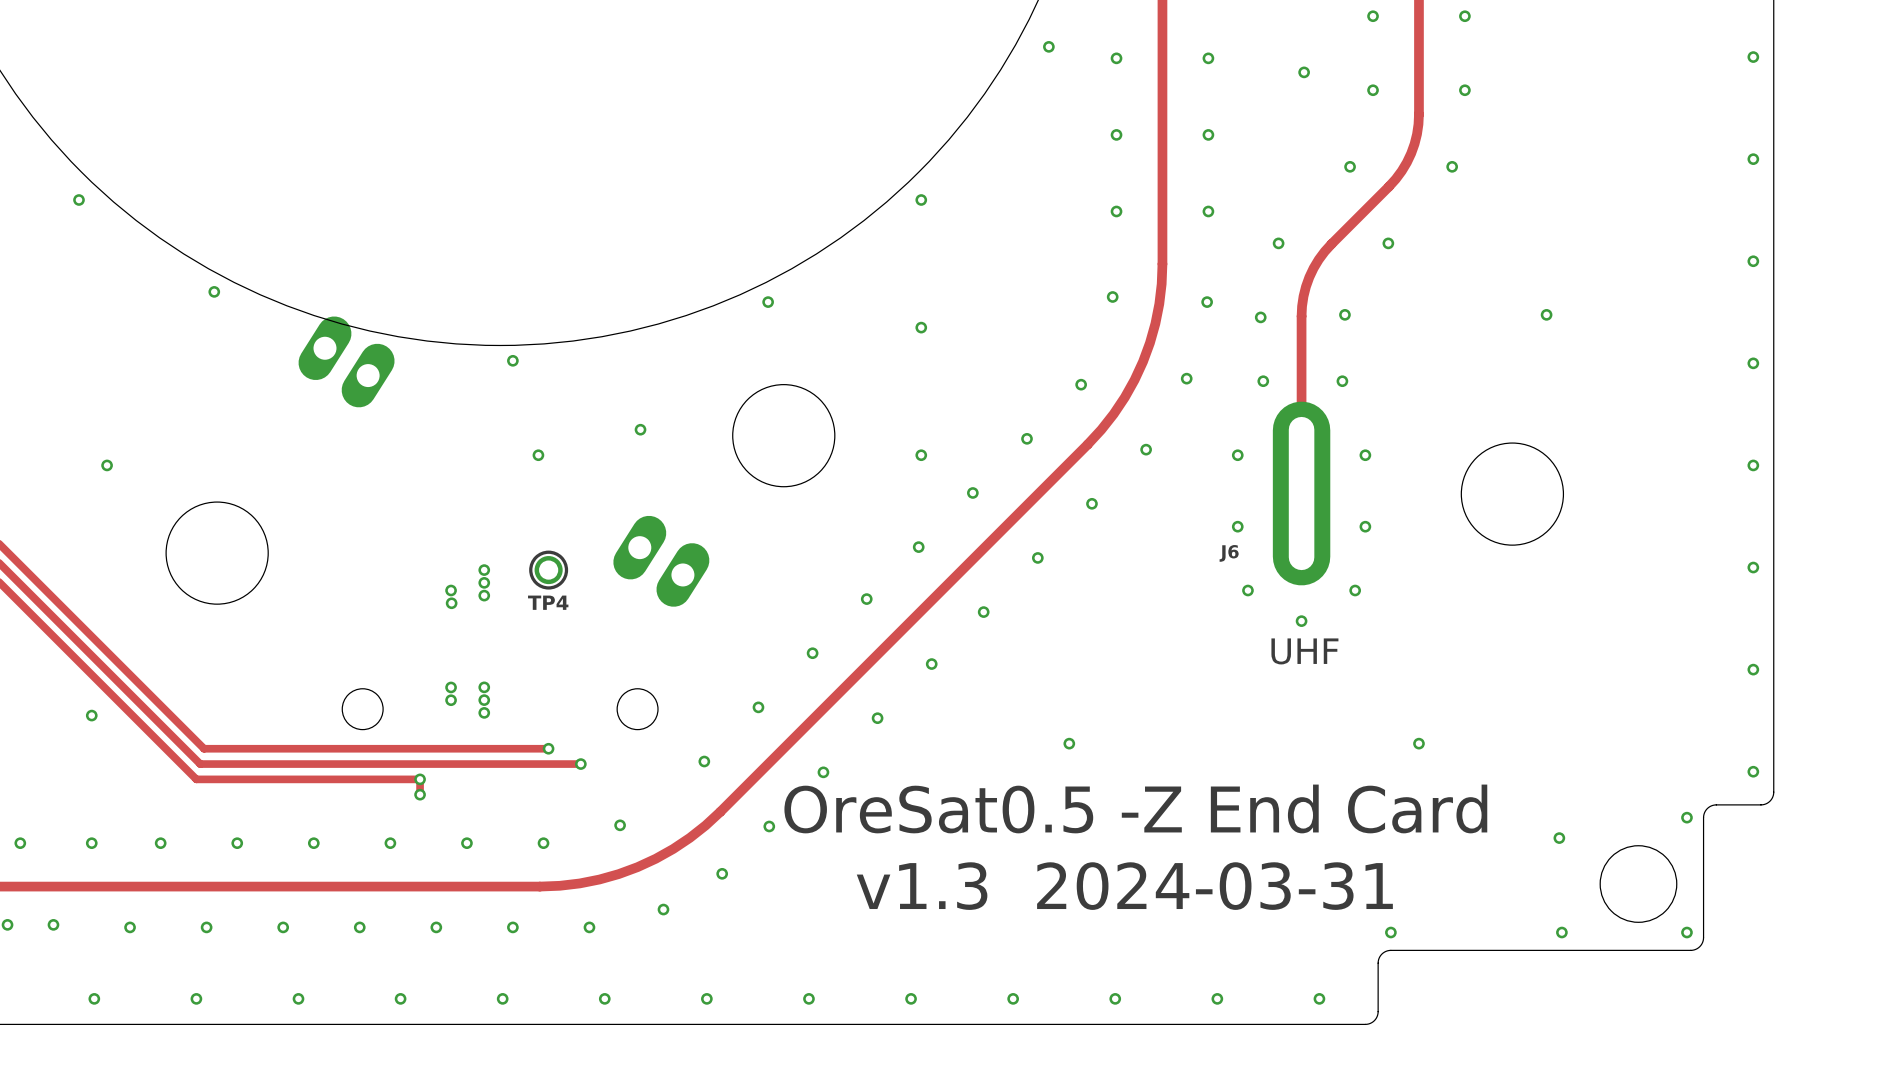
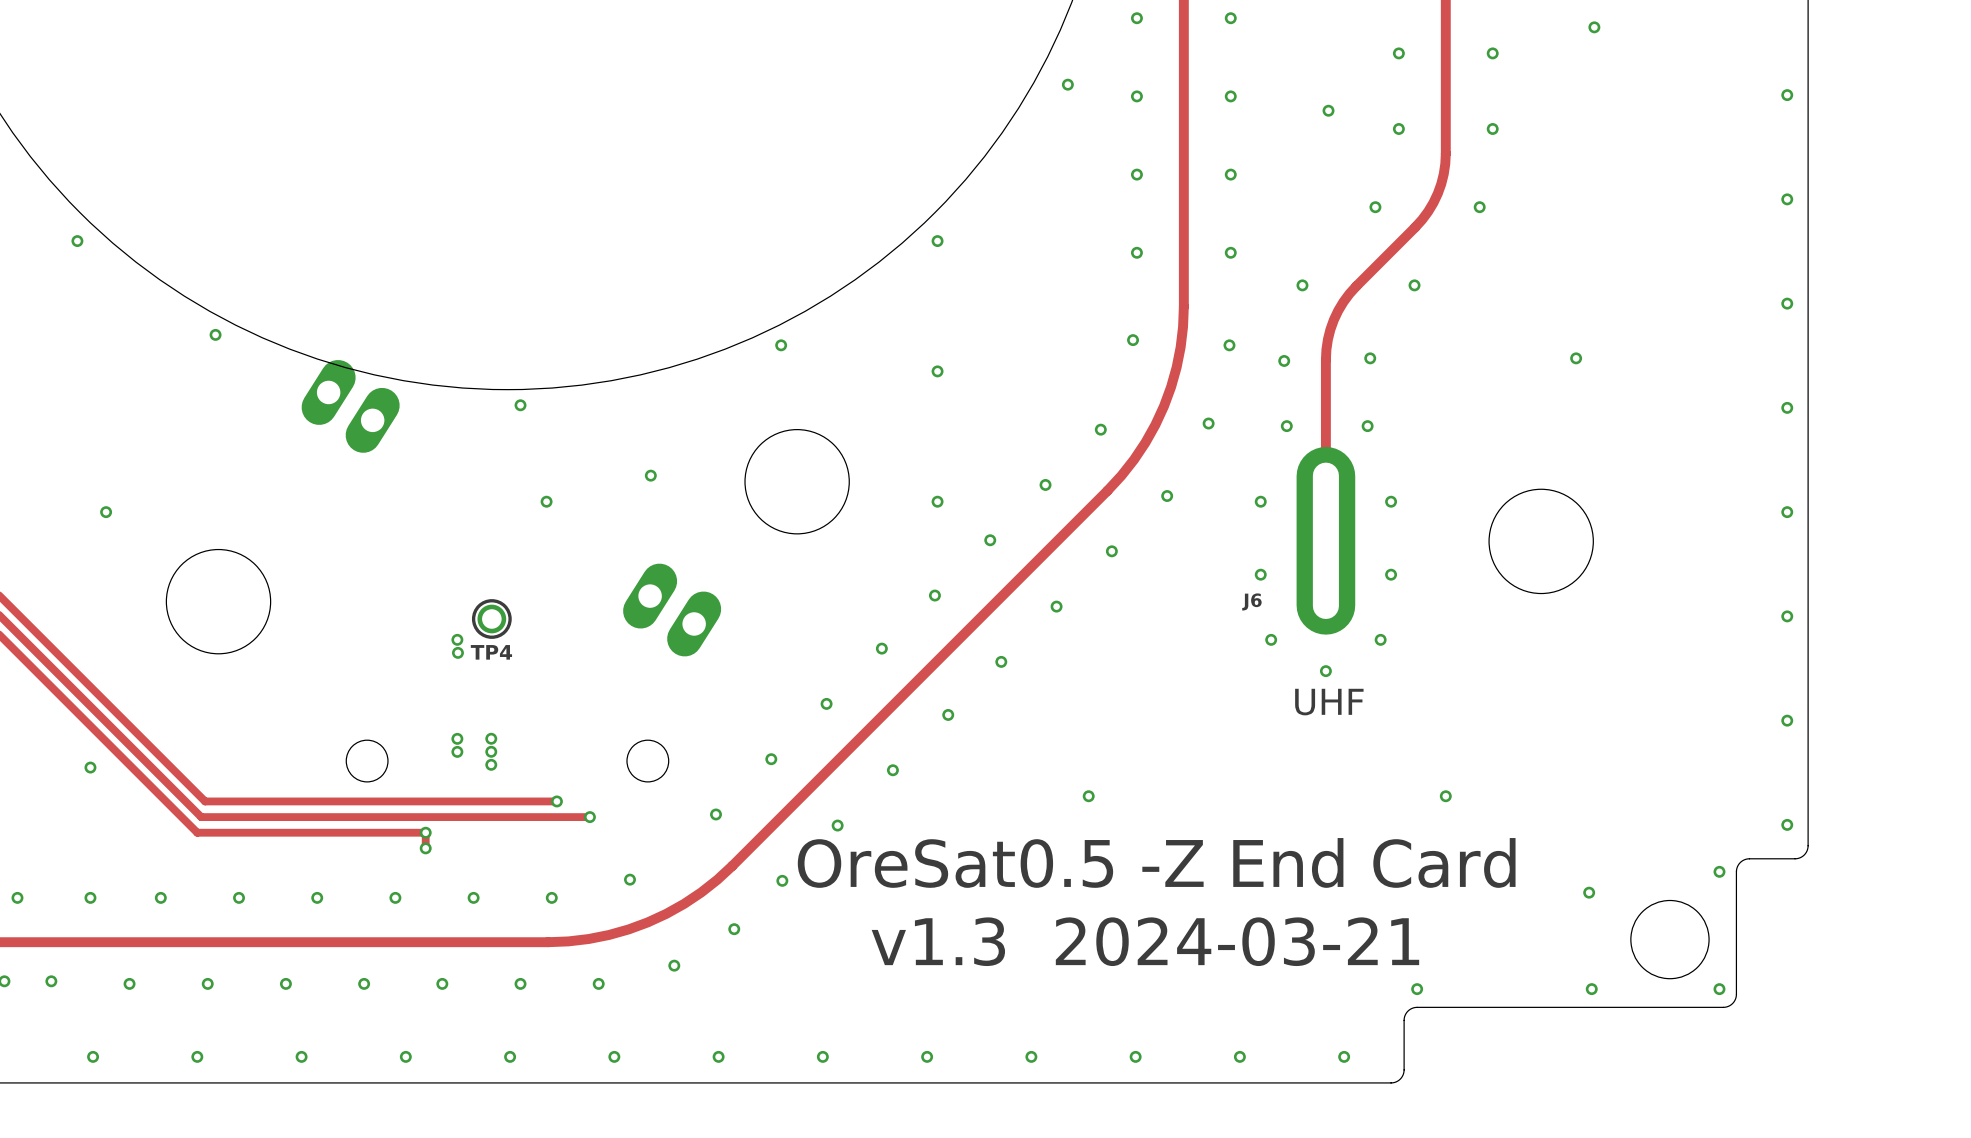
via: (484, 570) -> none
TP4 position: (548, 570) -> (491, 619)
via: (484, 582) -> none
via: (484, 595) -> none
text: v1.3 2024-03-31 (1124, 886) -> v1.3 2024-03-21 (1145, 941)

